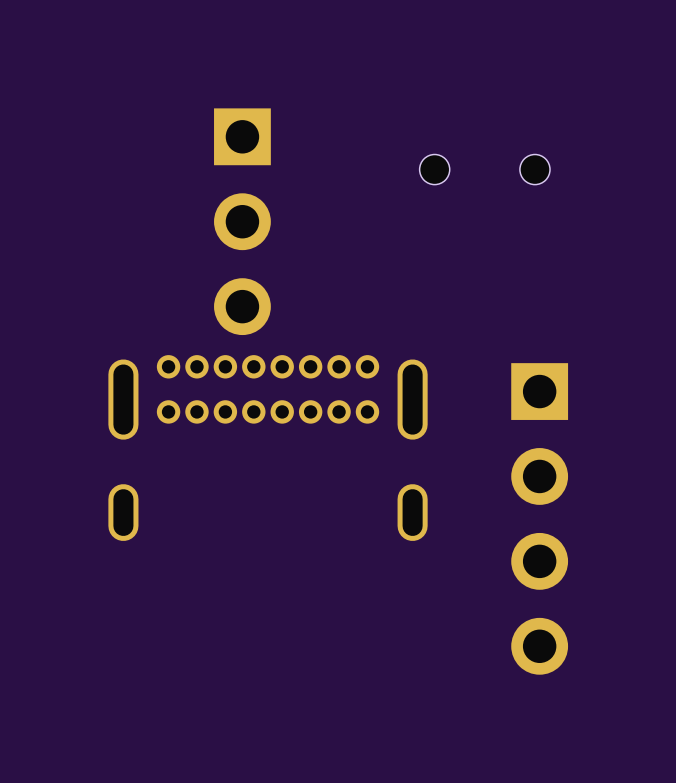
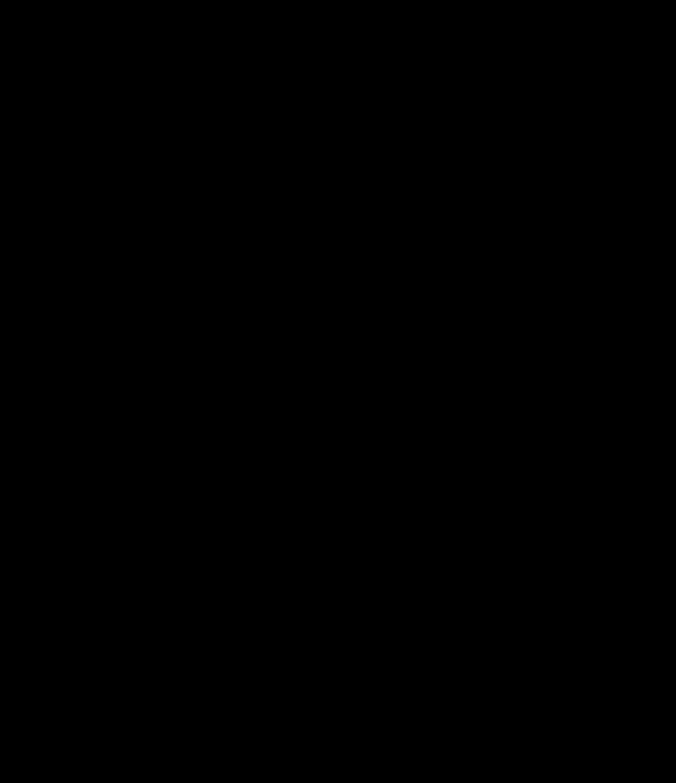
part: (484, 169) -> none
part: (242, 221) -> none
part: (268, 448) -> none
part: (539, 518) -> none

